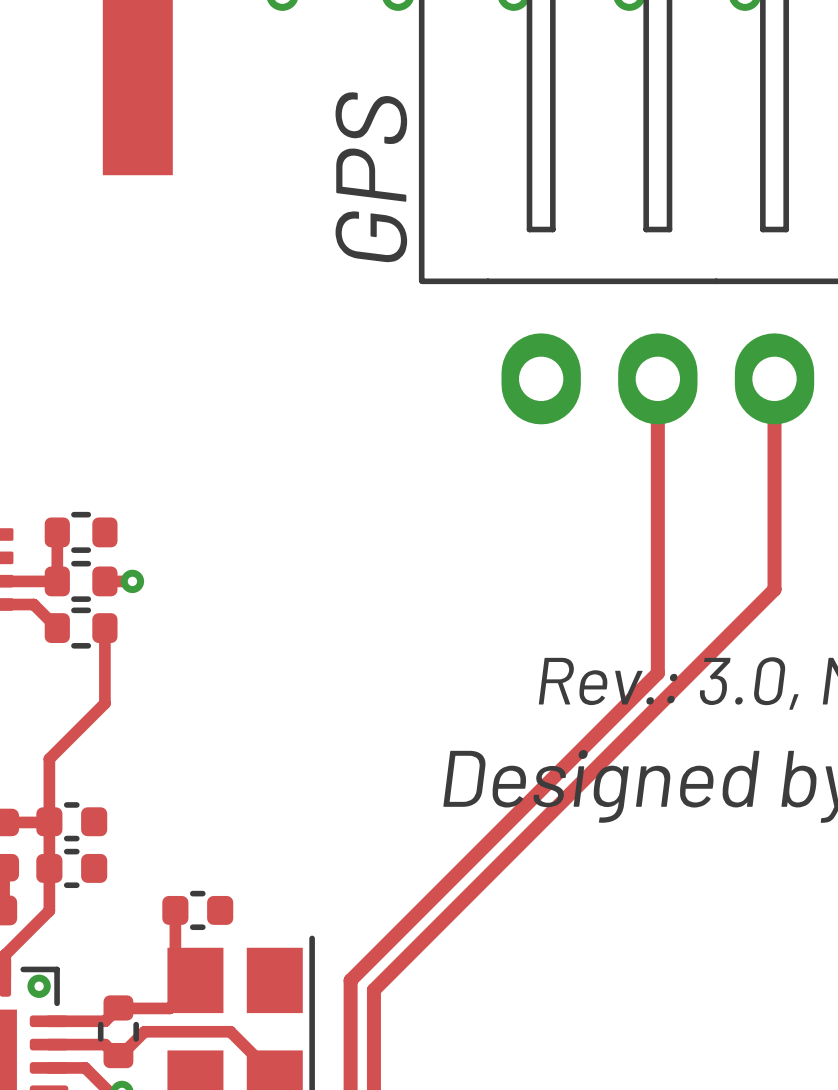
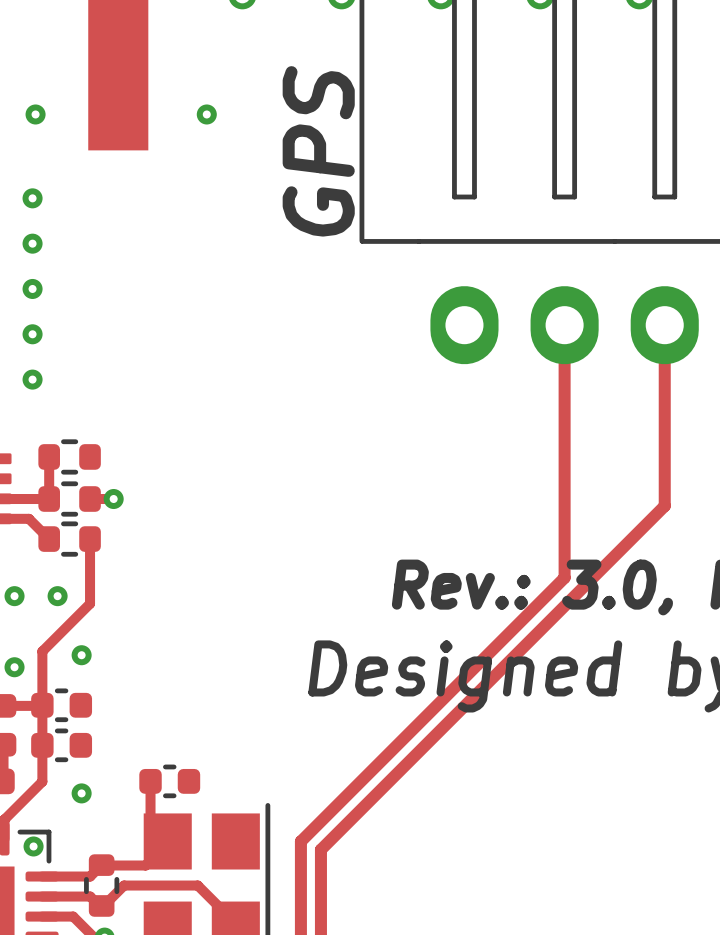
via: none -> (35, 114)
via: none -> (206, 114)
via: none -> (32, 198)
via: none -> (32, 243)
via: none -> (32, 288)
via: none -> (32, 334)
via: none -> (32, 379)
via: none -> (14, 596)
via: none -> (57, 596)
via: none -> (81, 655)
via: none -> (14, 667)
via: none -> (81, 793)

